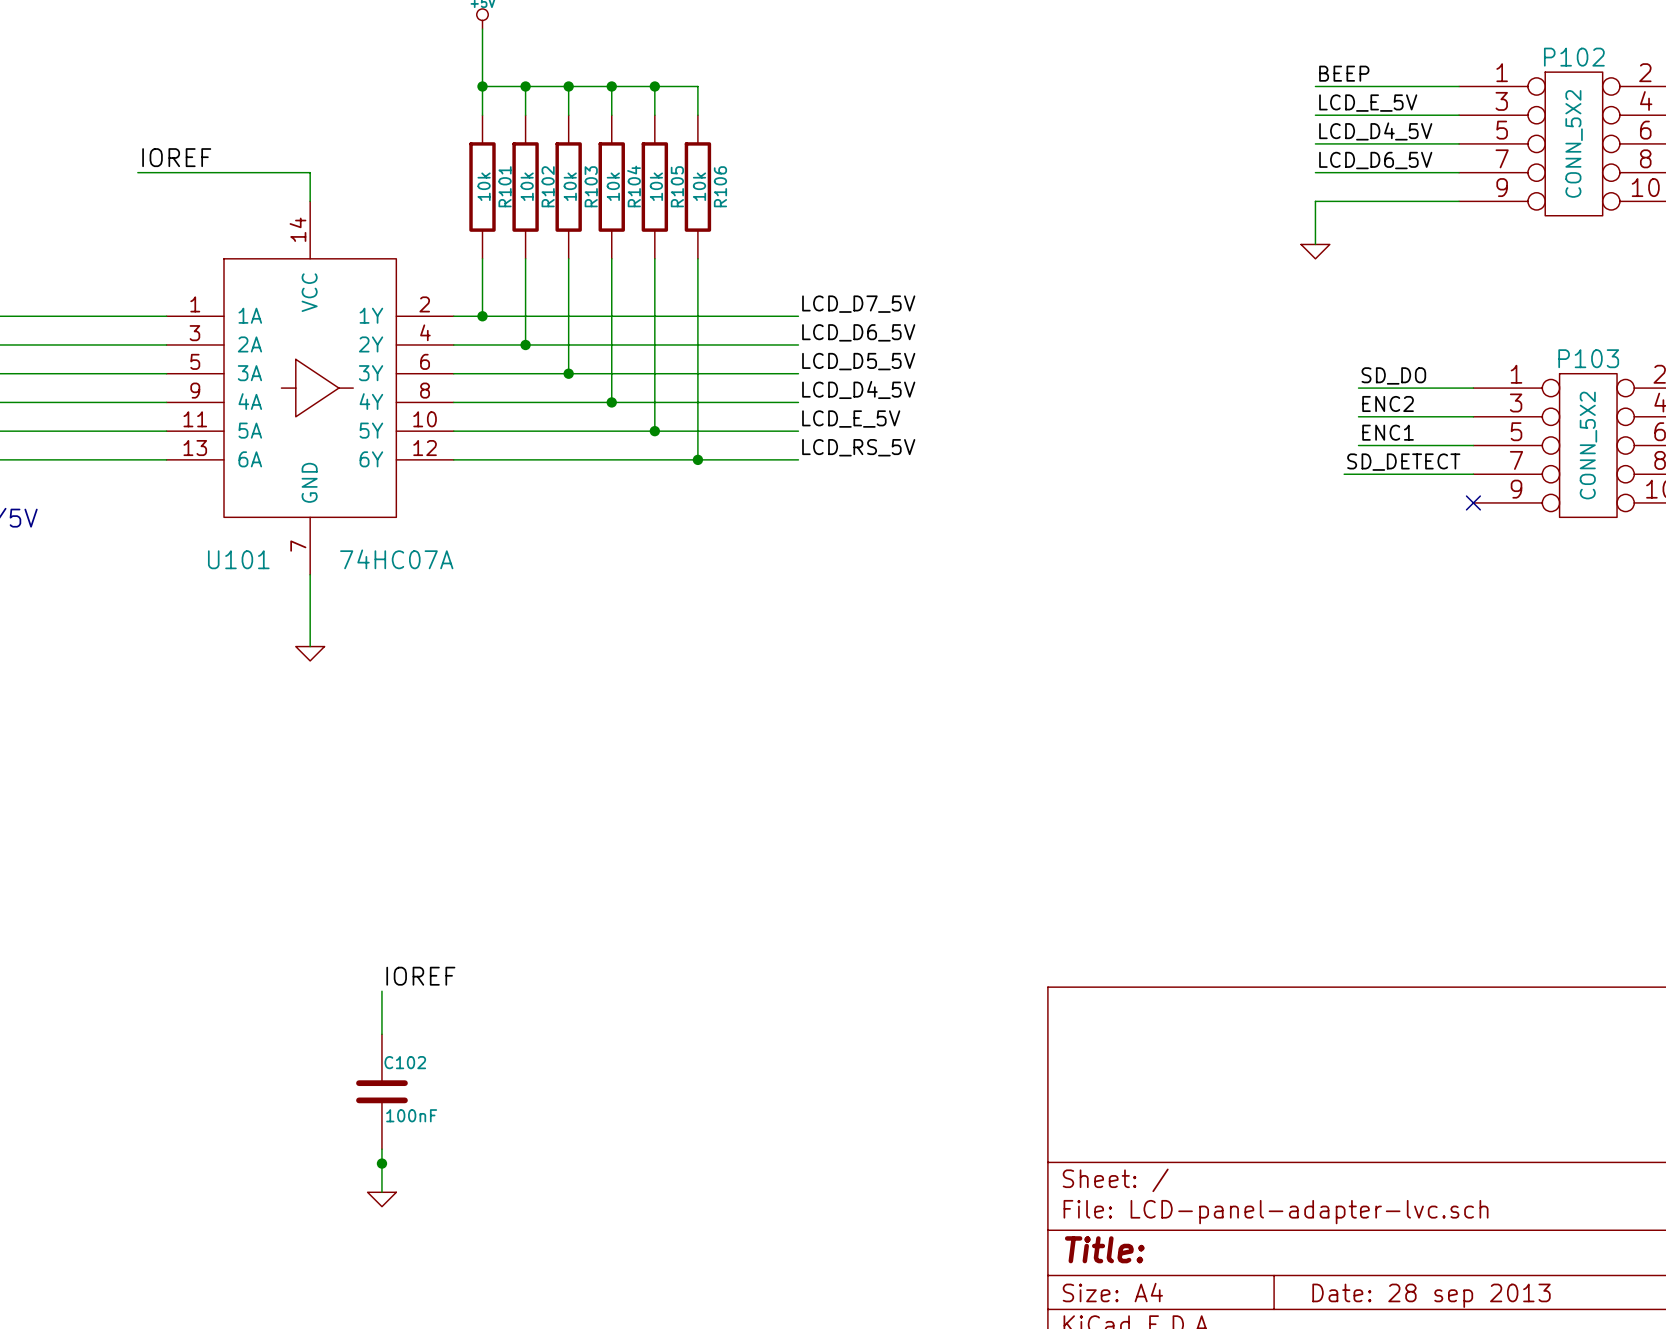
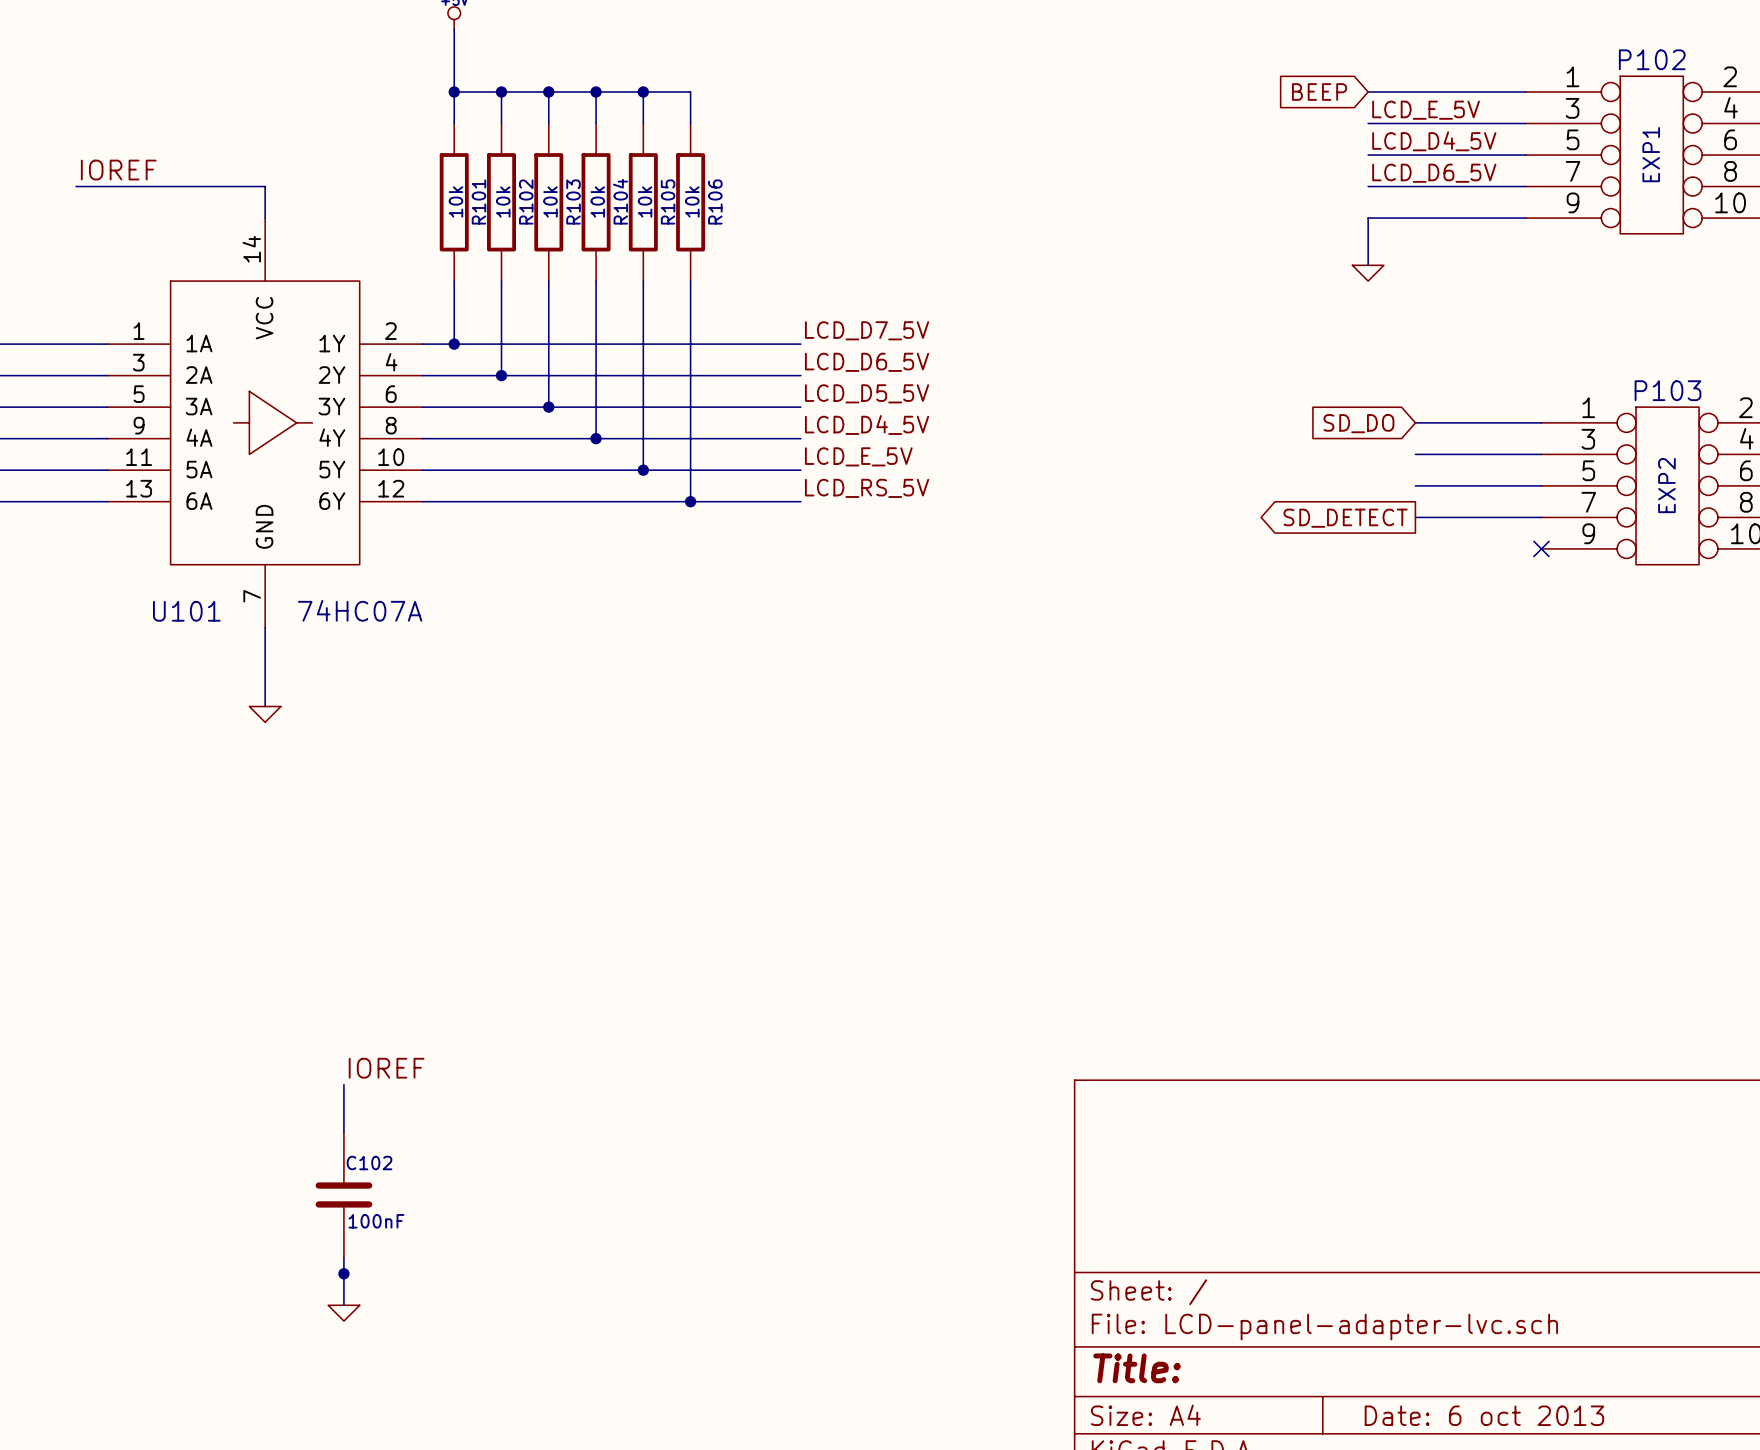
label: BEEP (1344, 73) -> none
global label: none -> BEEP (1319, 91)
P102 value: CONN_5X2 (1574, 143) -> EXP1 (1651, 154)
label: SD_DO (1393, 375) -> none
global label: none -> SD_DO (1358, 423)
label: ENC2 (1388, 403) -> none
label: ENC1 (1388, 432) -> none
P103 value: CONN_5X2 (1588, 445) -> EXP2 (1666, 485)
label: SD_DETECT (1403, 462) -> none
global label: none -> SD_DETECT (1345, 518)
wire: (1344, 474) (1358, 474) -> none
title block: Date: 28 sep 2013 (1431, 1295) -> Date: 6 oct 2013 (1484, 1415)

